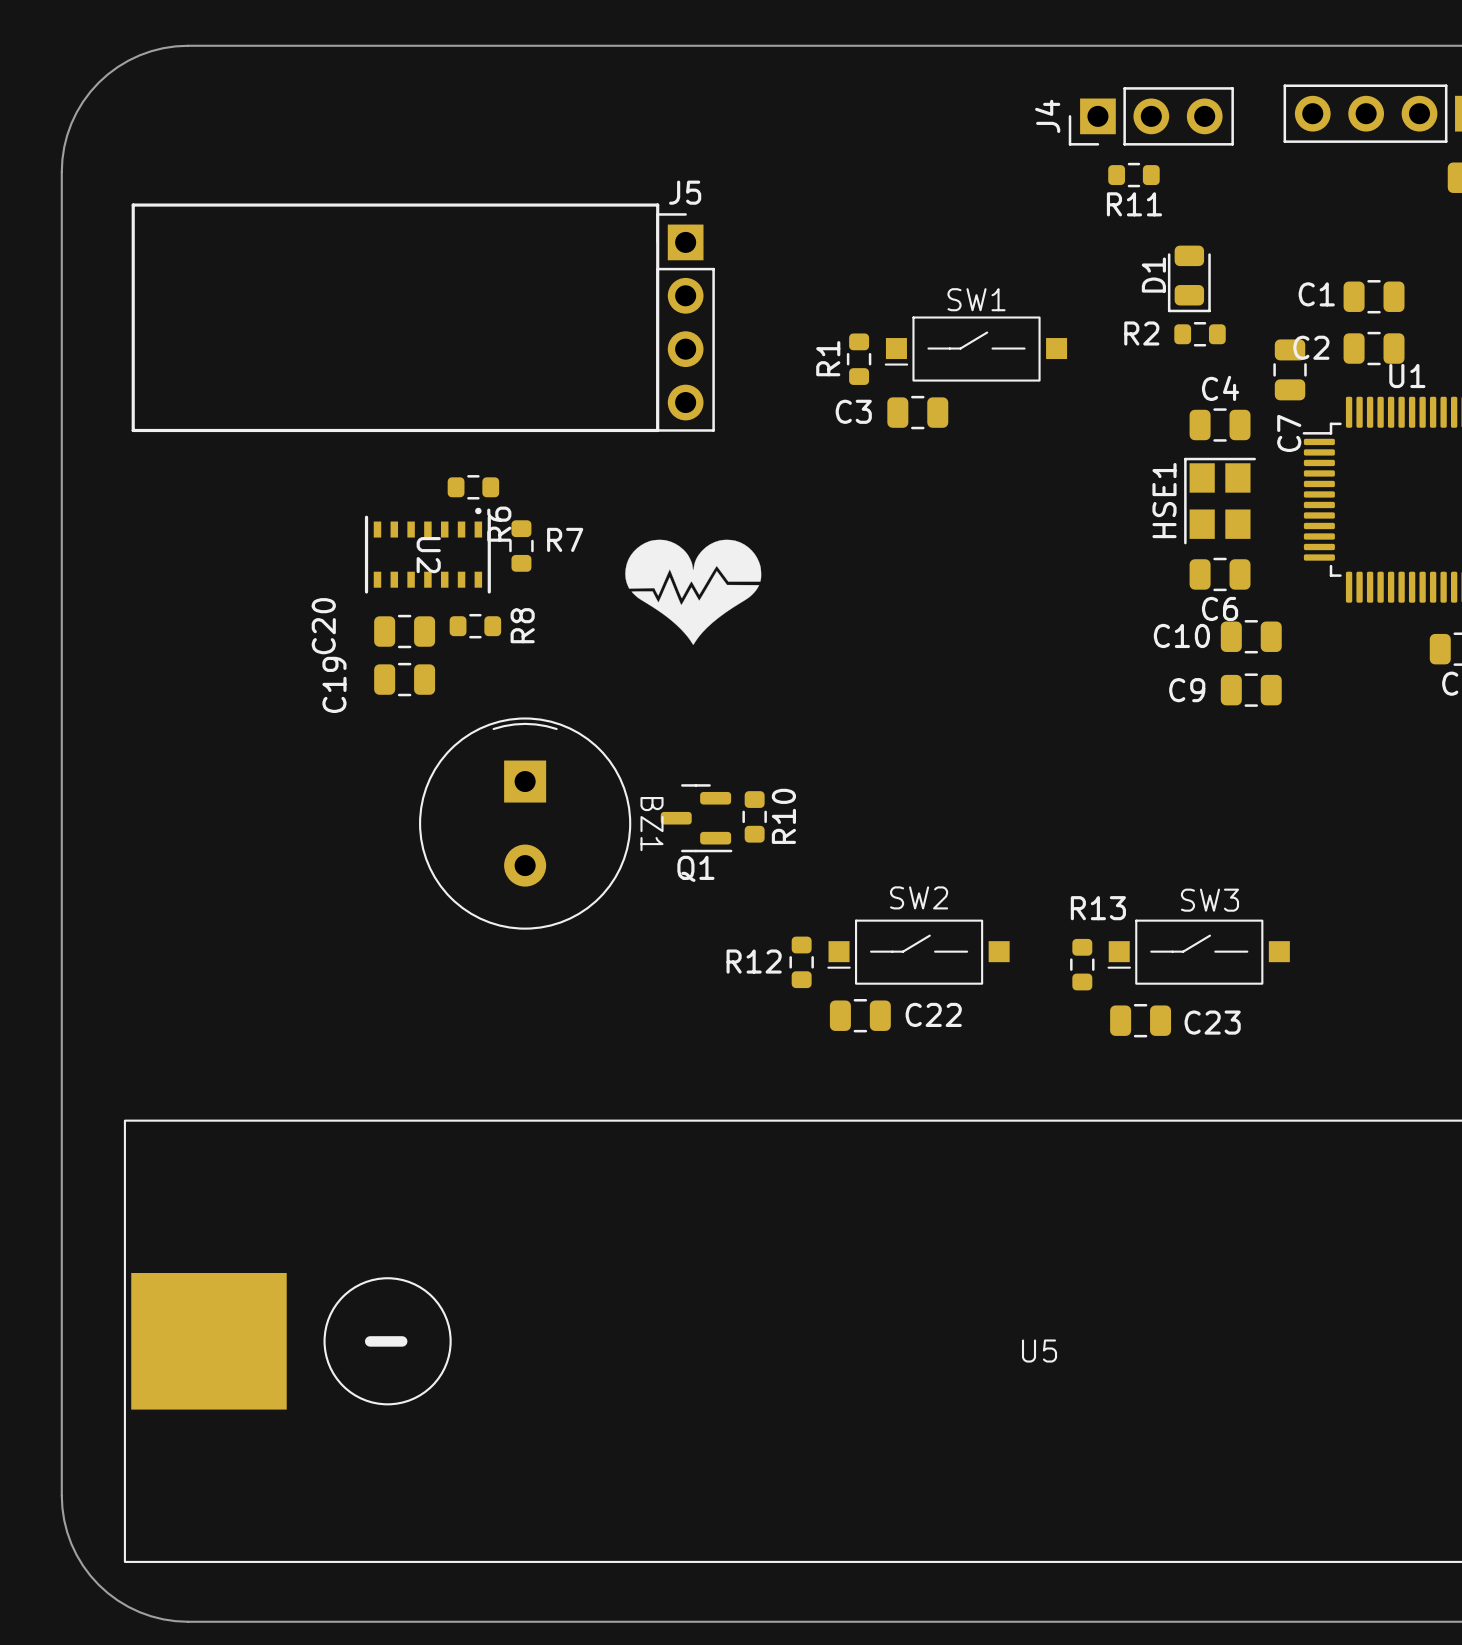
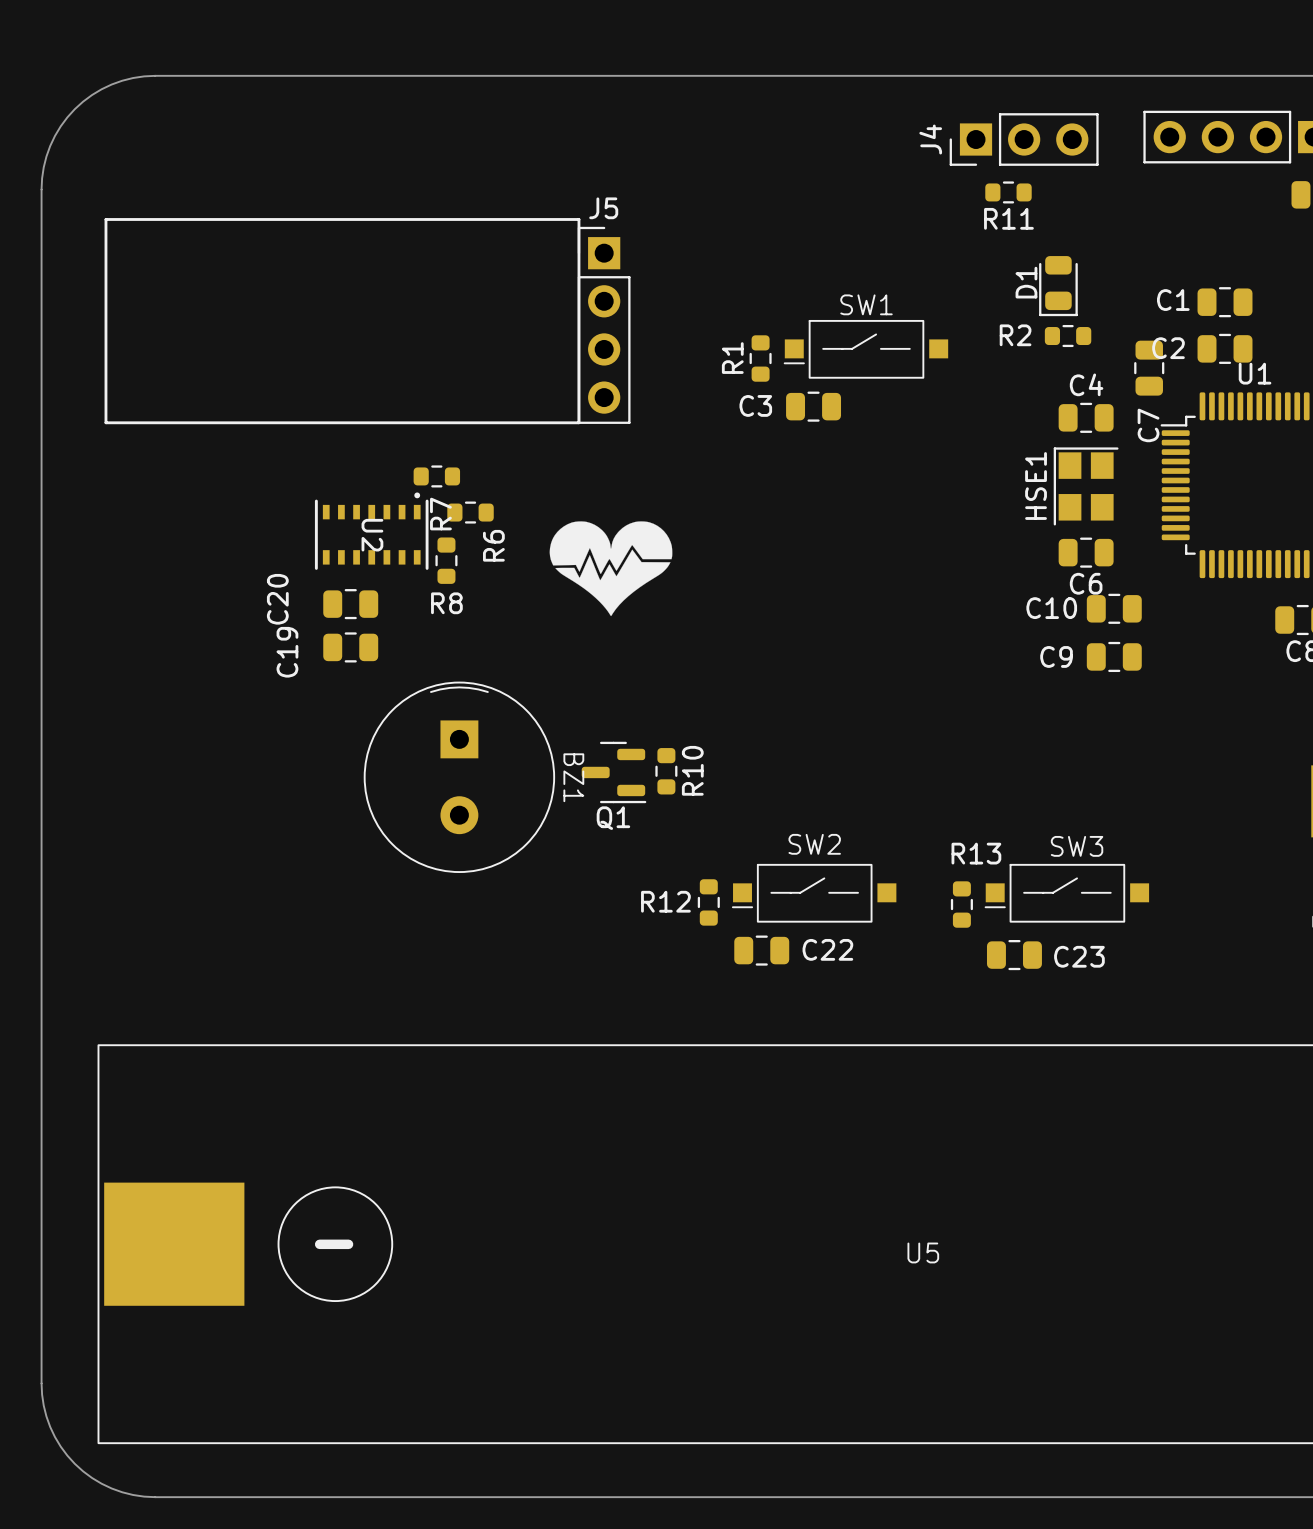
R6 position: (473, 487) -> (470, 512)
R7 rotation: 0° (521, 546) -> 90° clockwise (436, 476)
R7 position: (521, 546) -> (436, 476)
R8 rotation: 0° (475, 626) -> 90° clockwise (446, 560)
R8 position: (475, 626) -> (446, 560)

